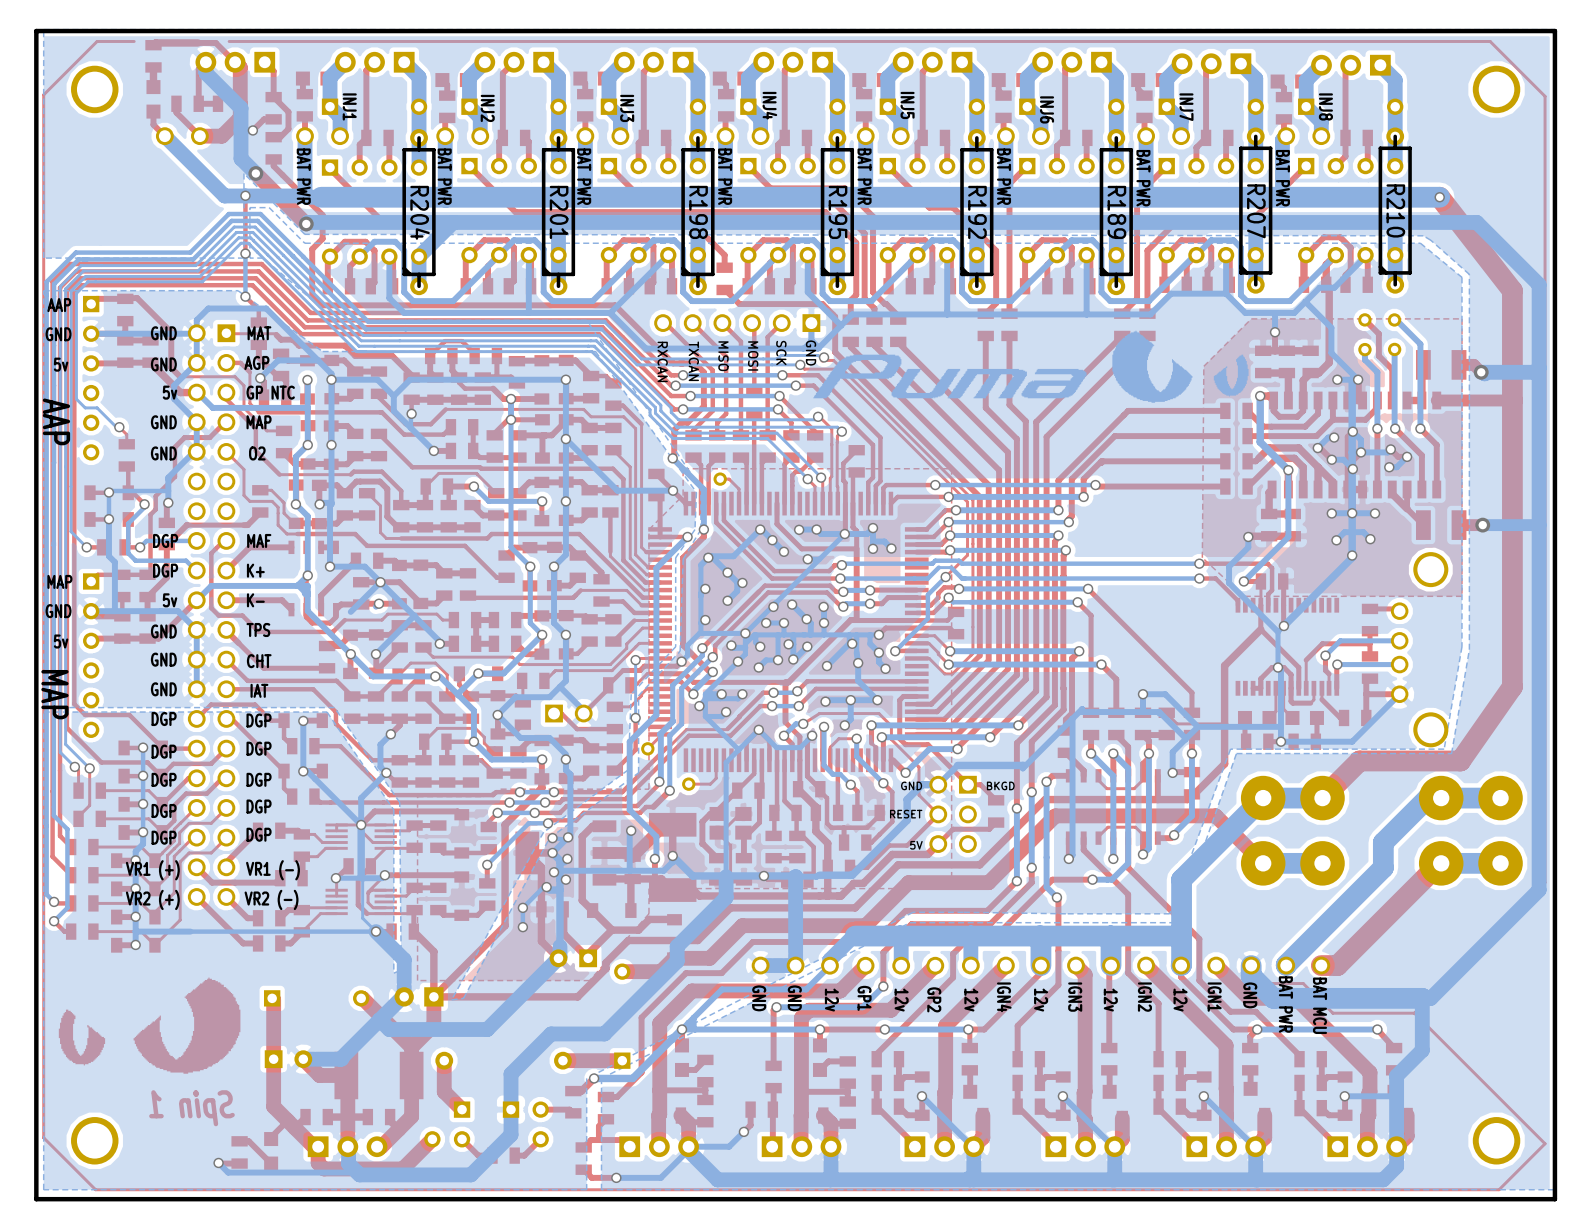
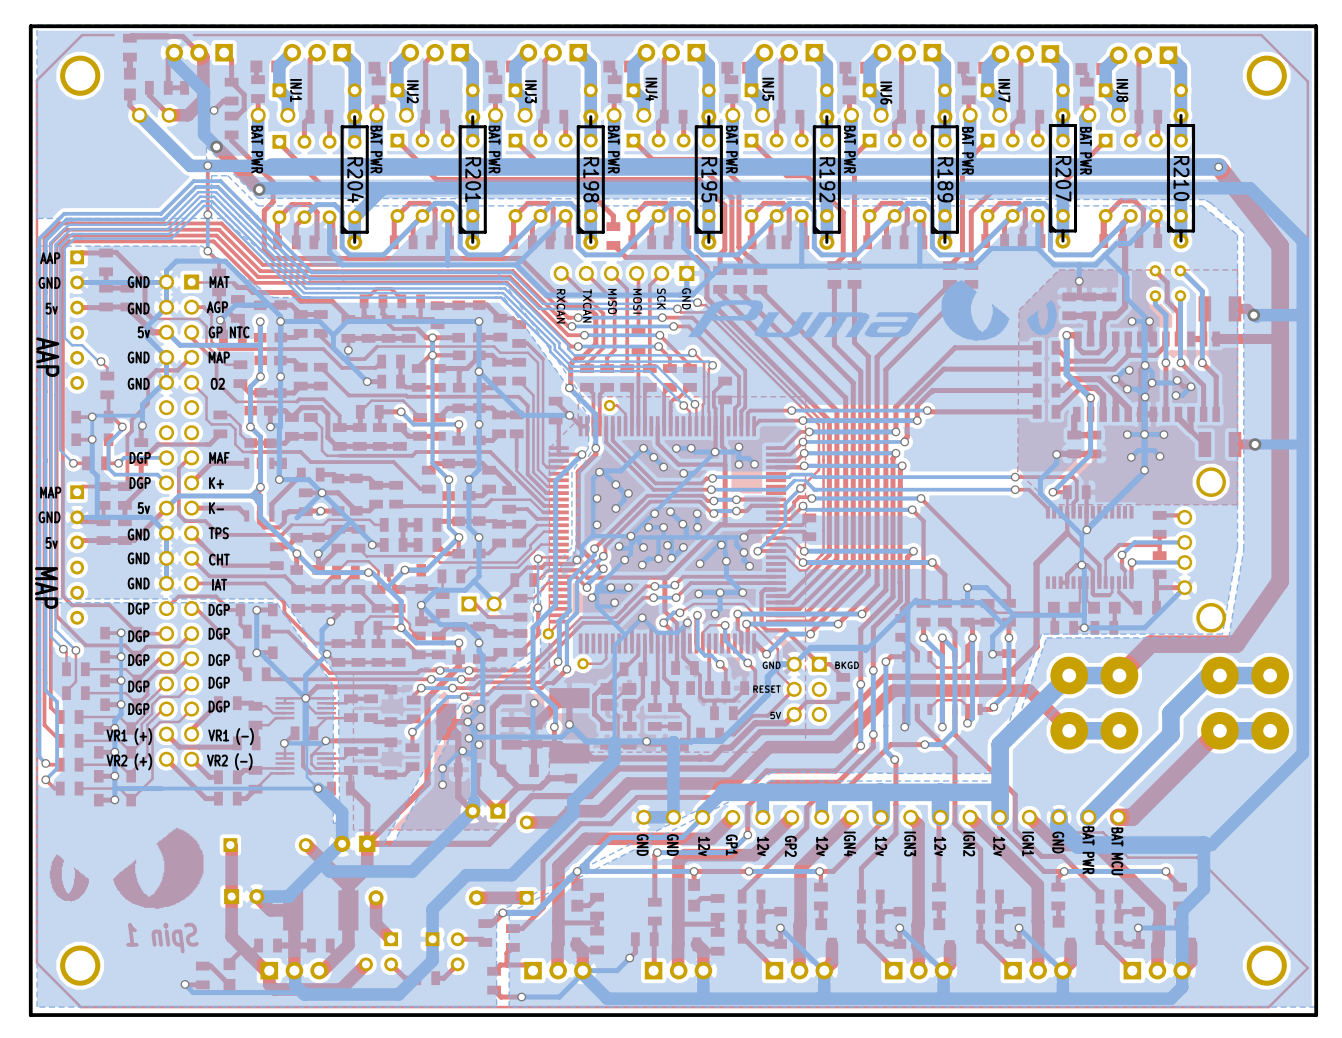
top track: (798, 789) (815, 806) (815, 831) (827, 843) (827, 895) -> none

